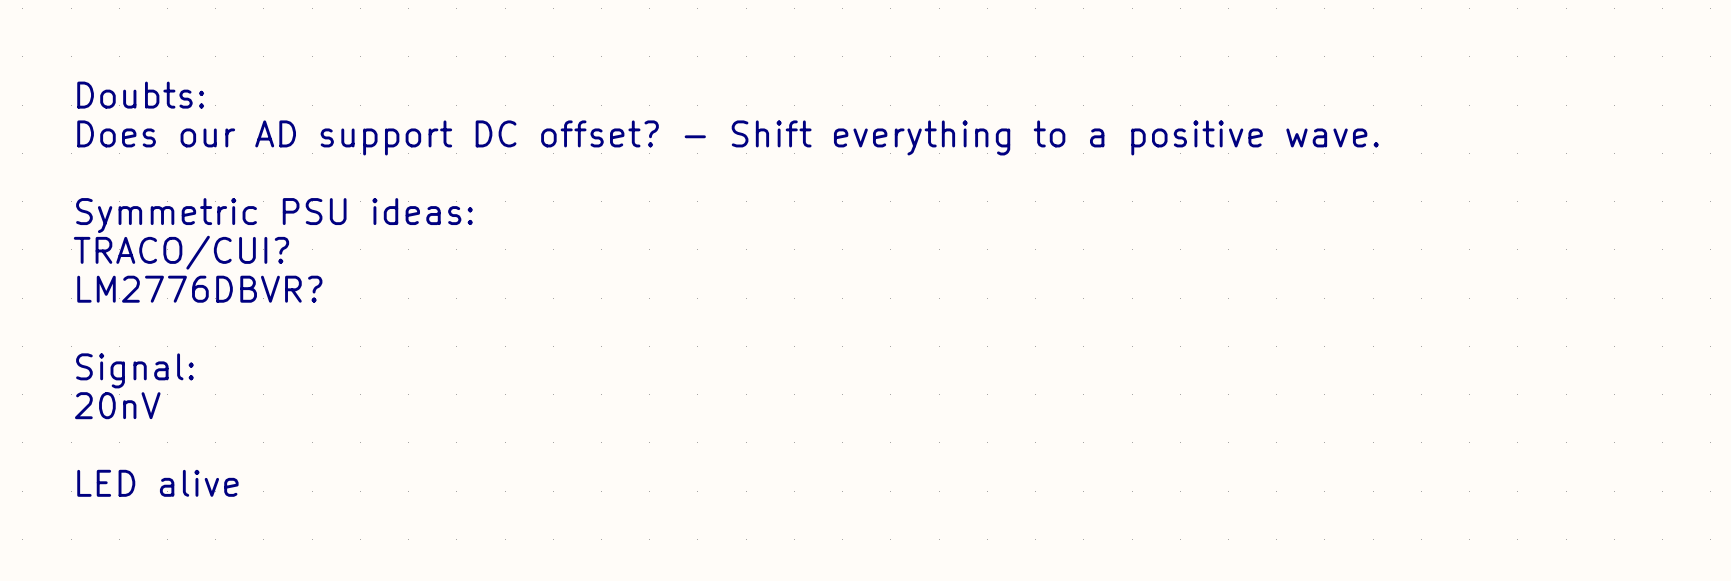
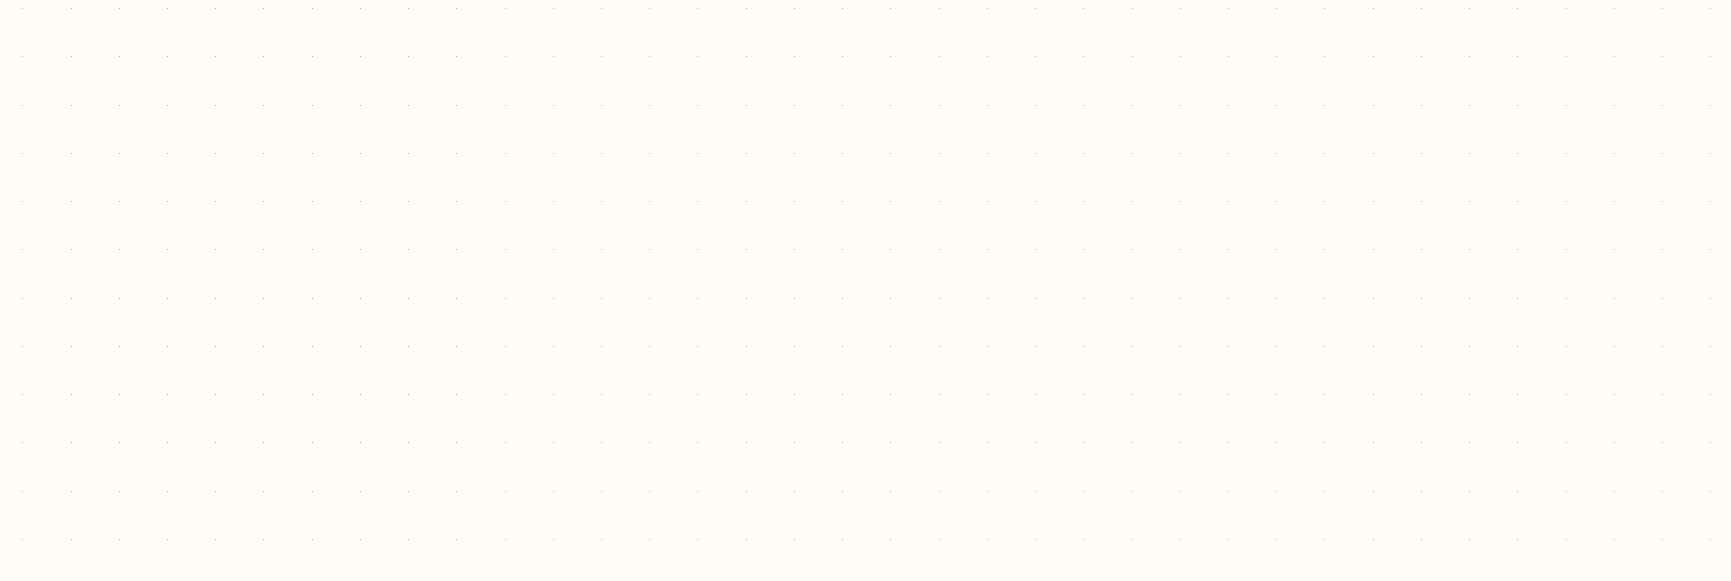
text: Doubts: (140, 95) -> none
text: Does our AD support DC offset? - Shift everything to a positive wave. (728, 137) -> none
text: Symmetric PSU ideas: (274, 215) -> none
text: TRACO/CUI? (181, 252) -> none
text: LM2776DBVR? (199, 289) -> none
text: Signal: (134, 370) -> none
text: 20nV (117, 405) -> none
text: LED alive (157, 483) -> none

